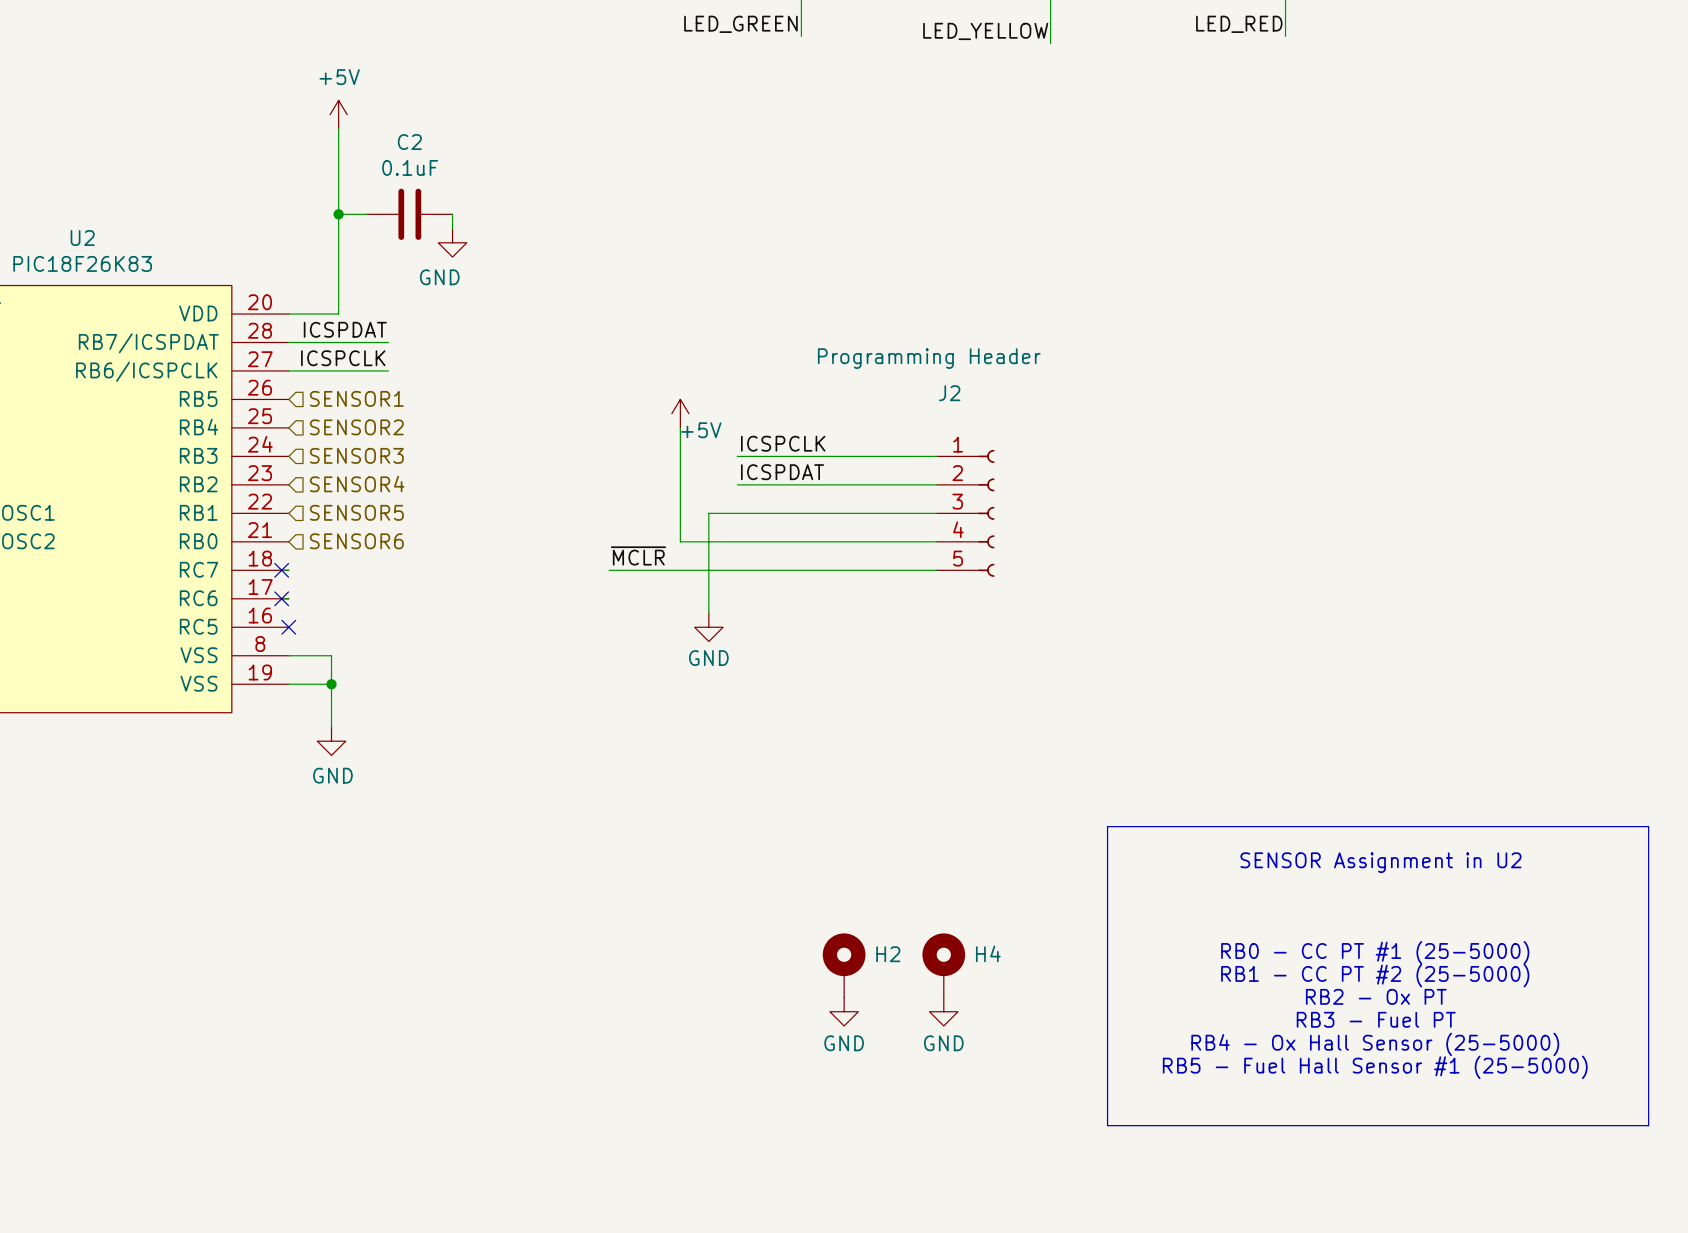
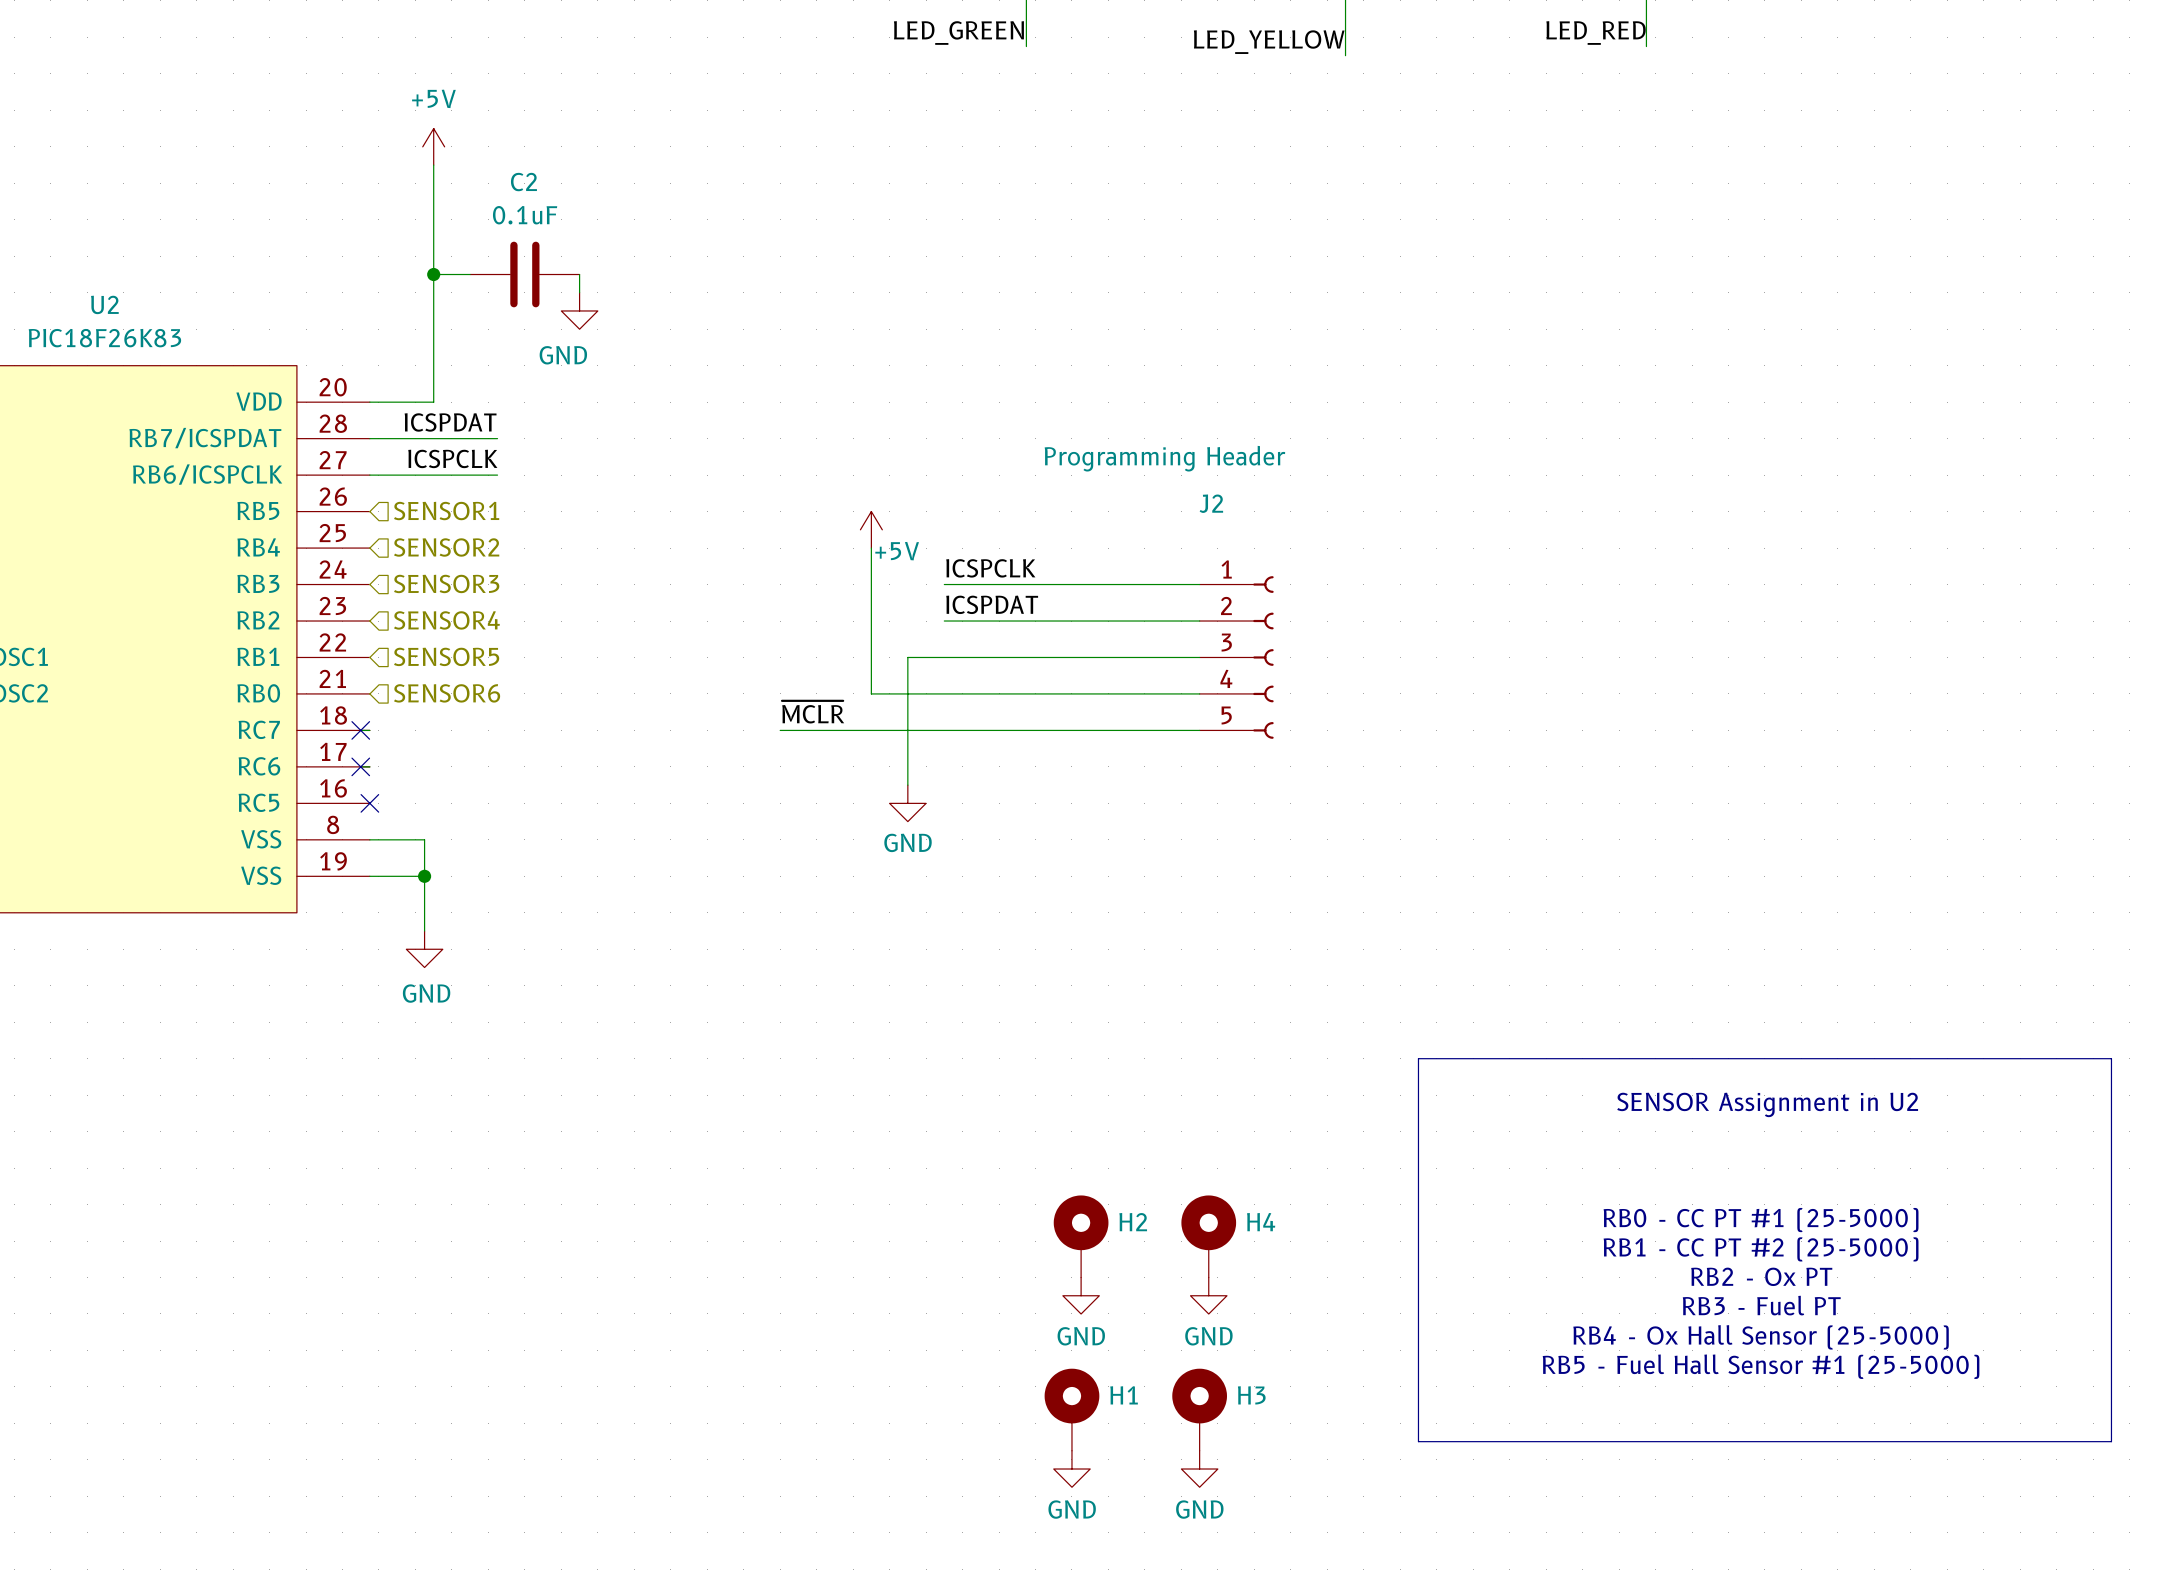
H1: none -> (1071, 1409)
H3: none -> (1199, 1409)
power symbol: none -> GND (1071, 1469)
power symbol: none -> GND (1199, 1469)

